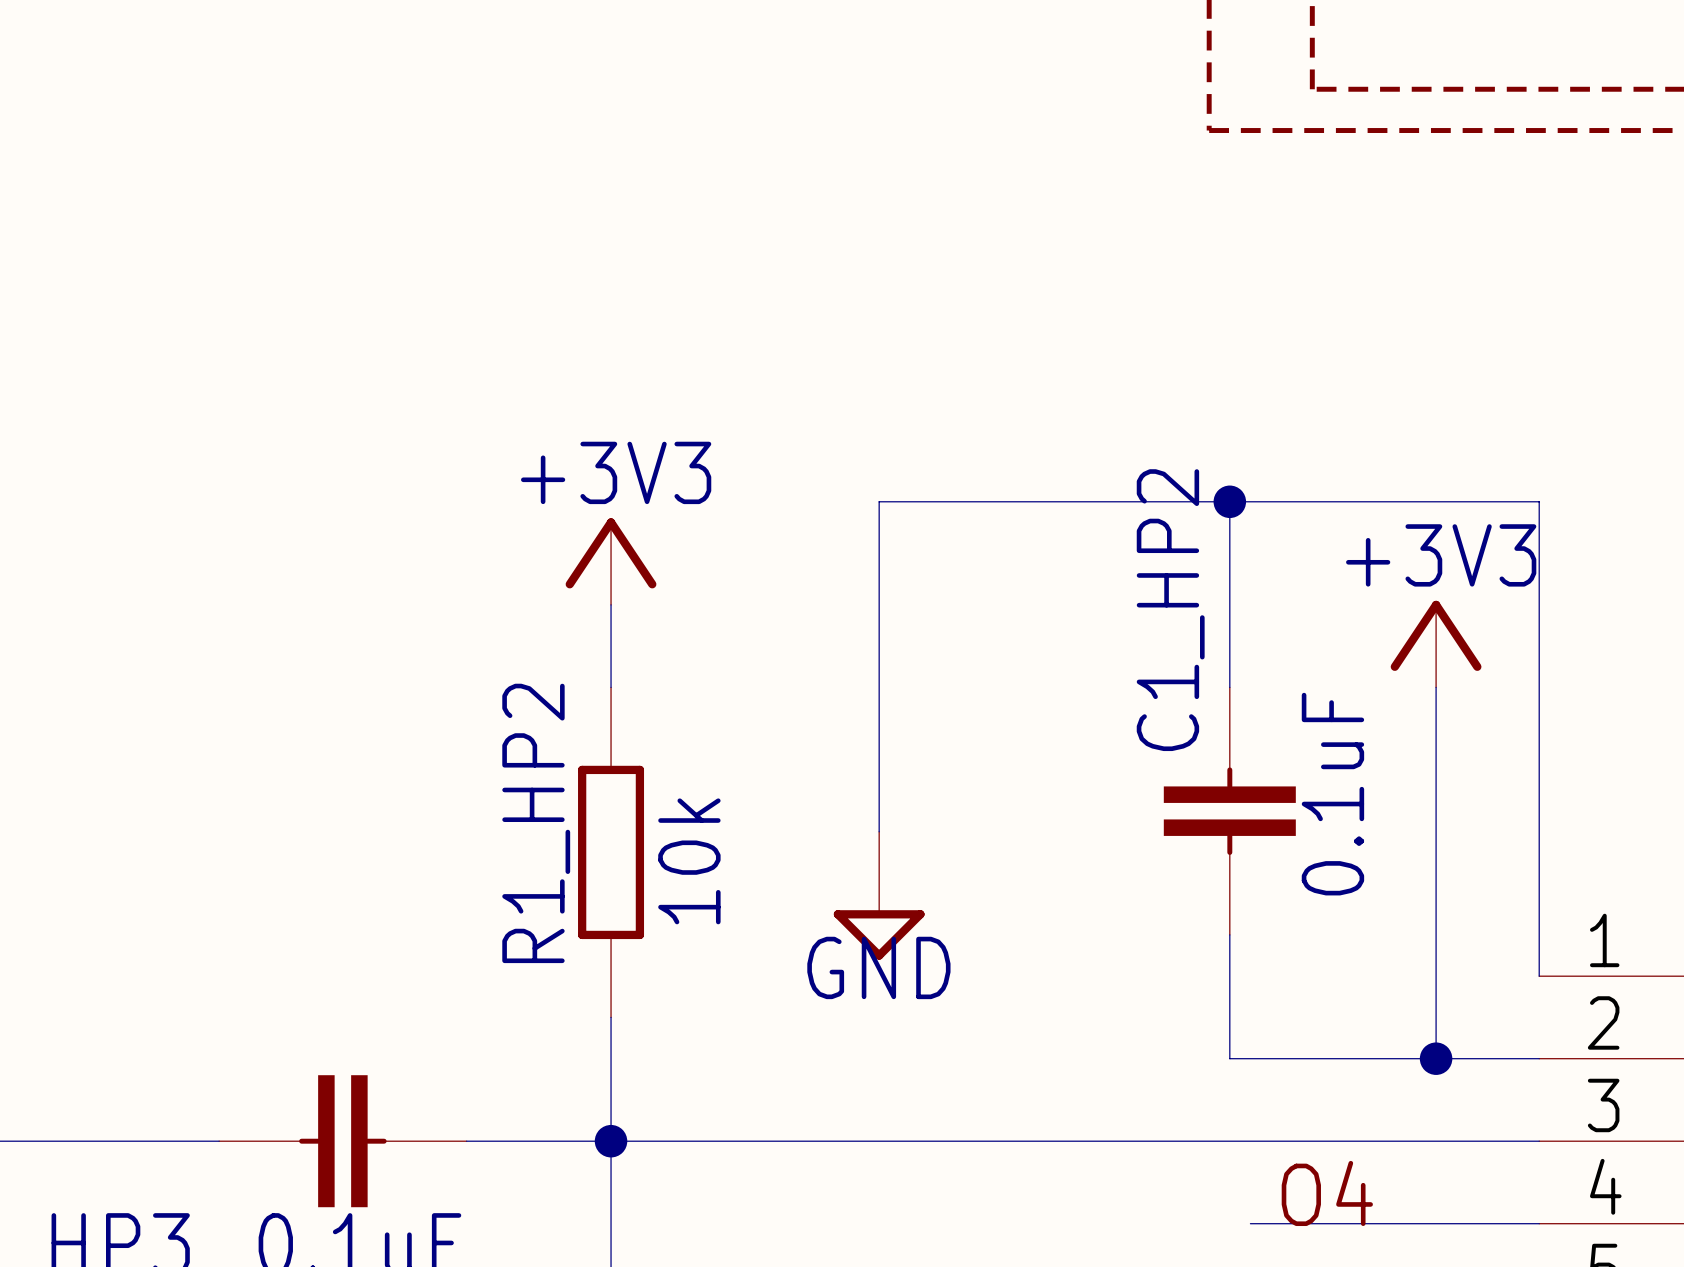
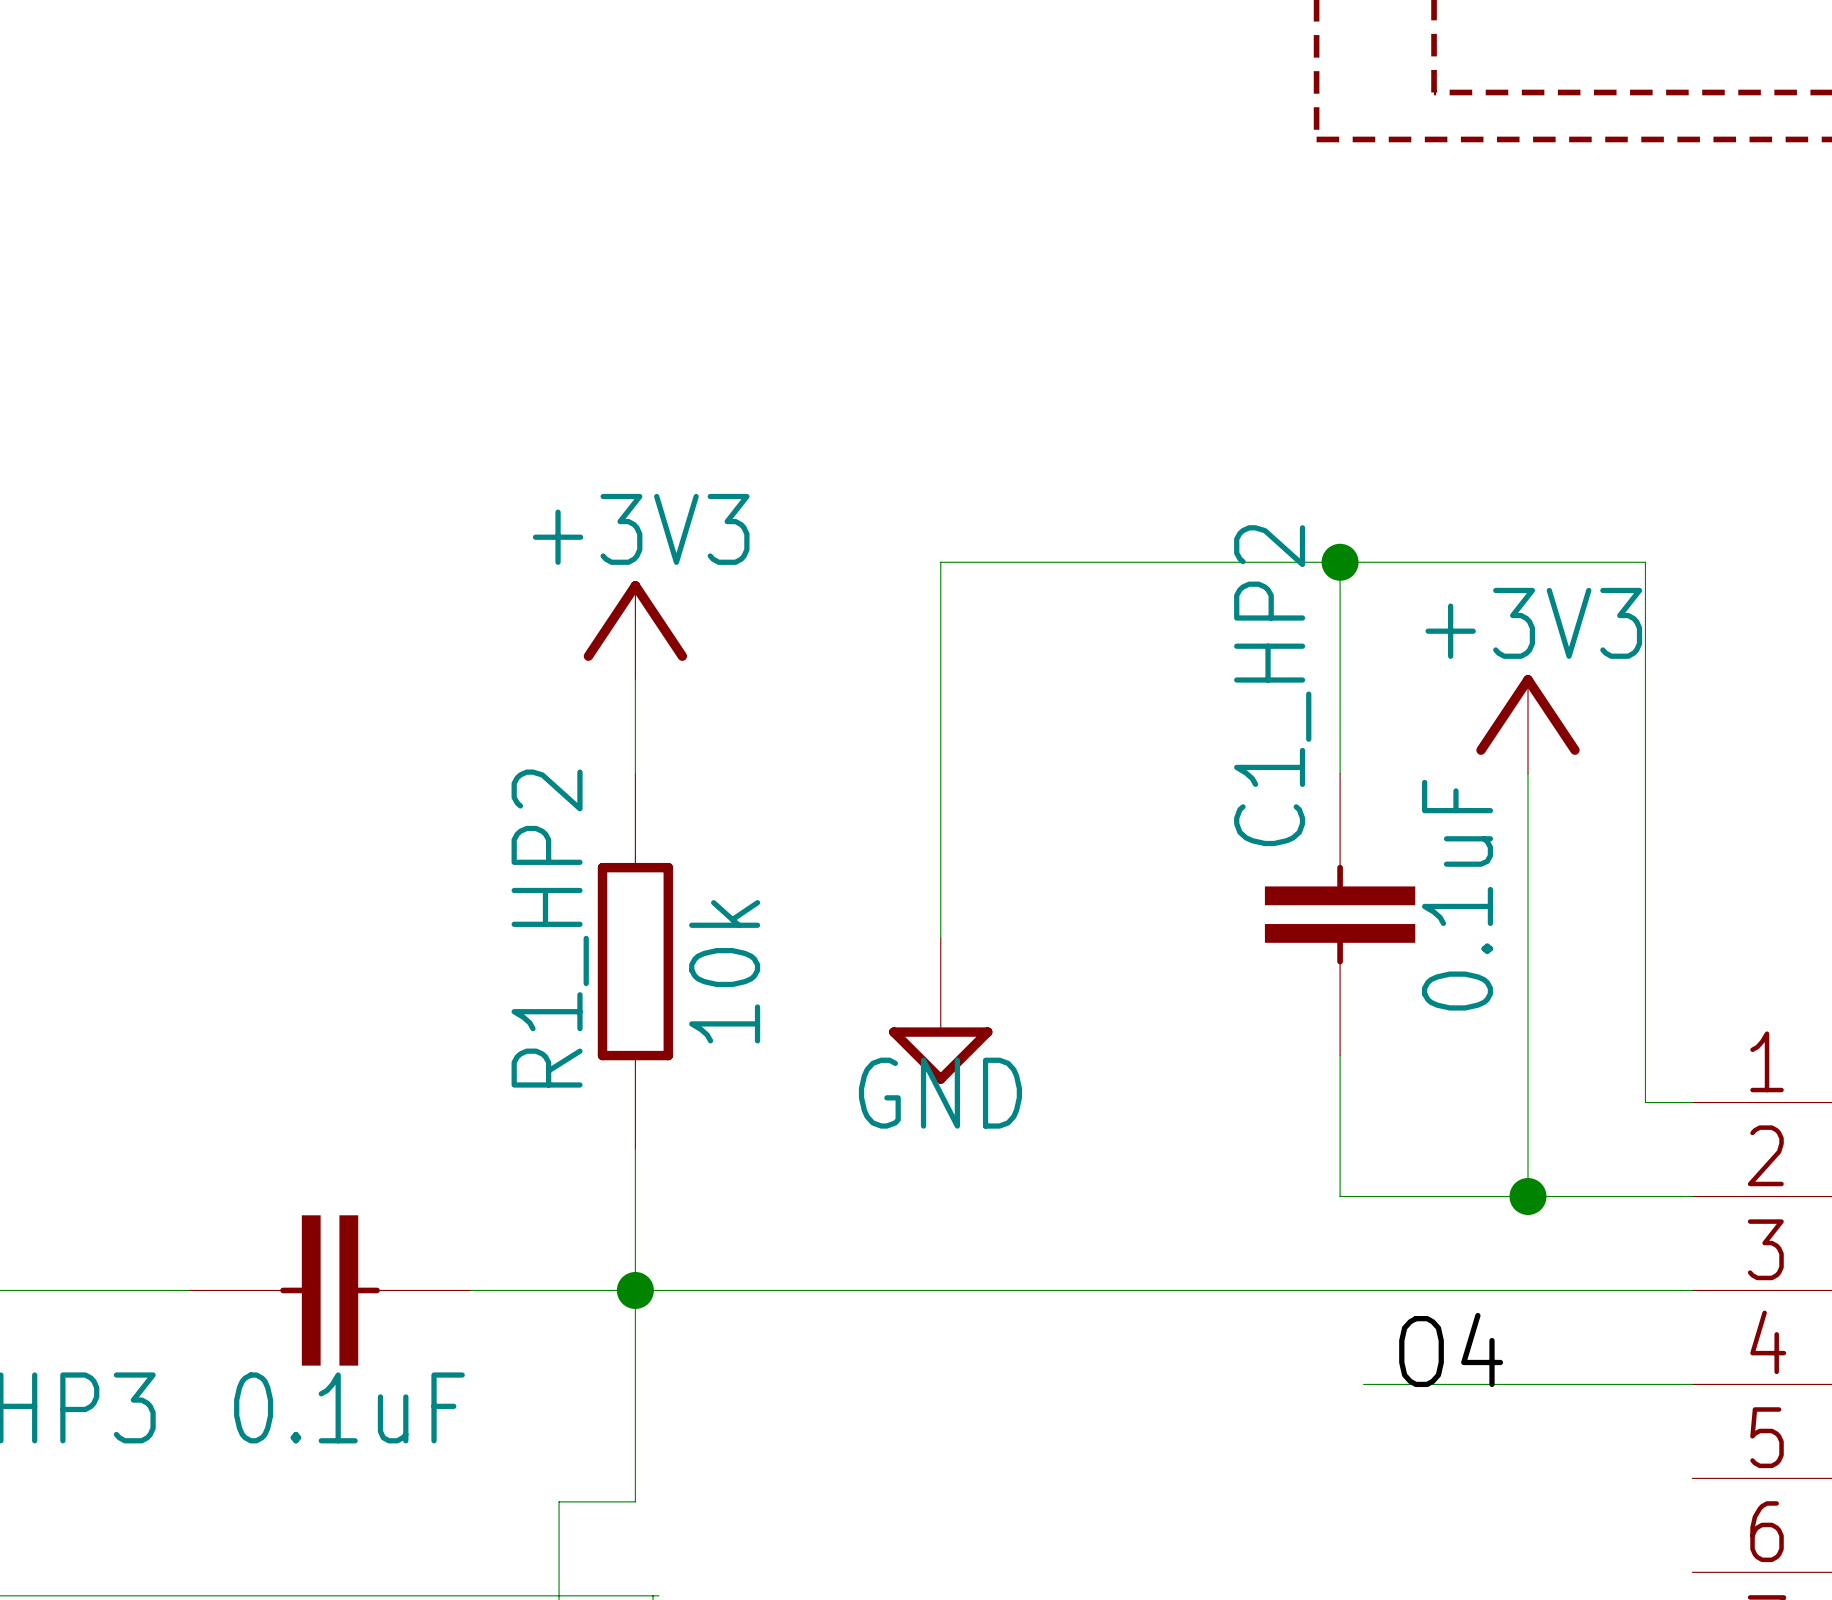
wire: (1497, 501) (1539, 501) (1539, 976) -> (1645, 562) (1645, 1102) (1692, 1102)
power symbol position: +3V3 (1436, 644) -> +3V3 (1527, 724)
wire: (1436, 687) (1436, 1058) -> (1527, 773) (1527, 1196)
junction position: (1436, 1058) -> (1527, 1196)

